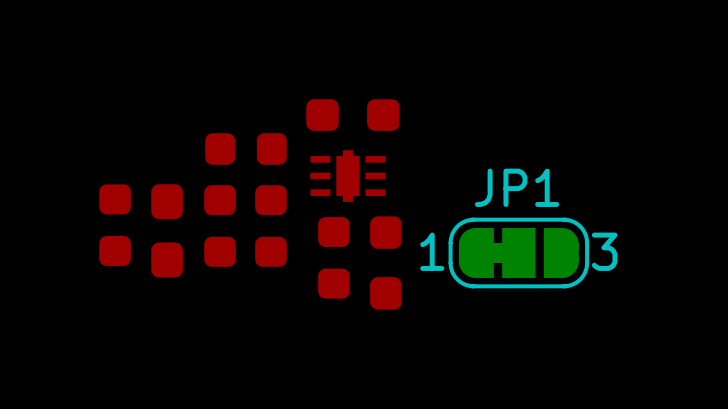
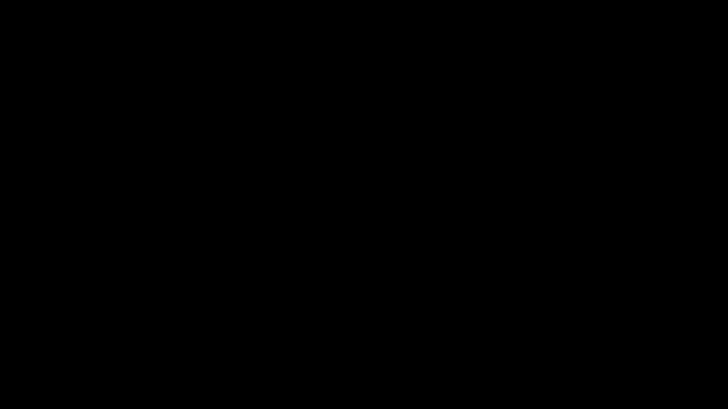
part: (352, 115) -> none
part: (246, 149) -> none
part: (347, 176) -> none
part: (115, 225) -> none
part: (220, 226) -> none
part: (271, 226) -> none
part: (167, 230) -> none
JP1: (518, 253) -> none
part: (333, 257) -> none
part: (385, 263) -> none

